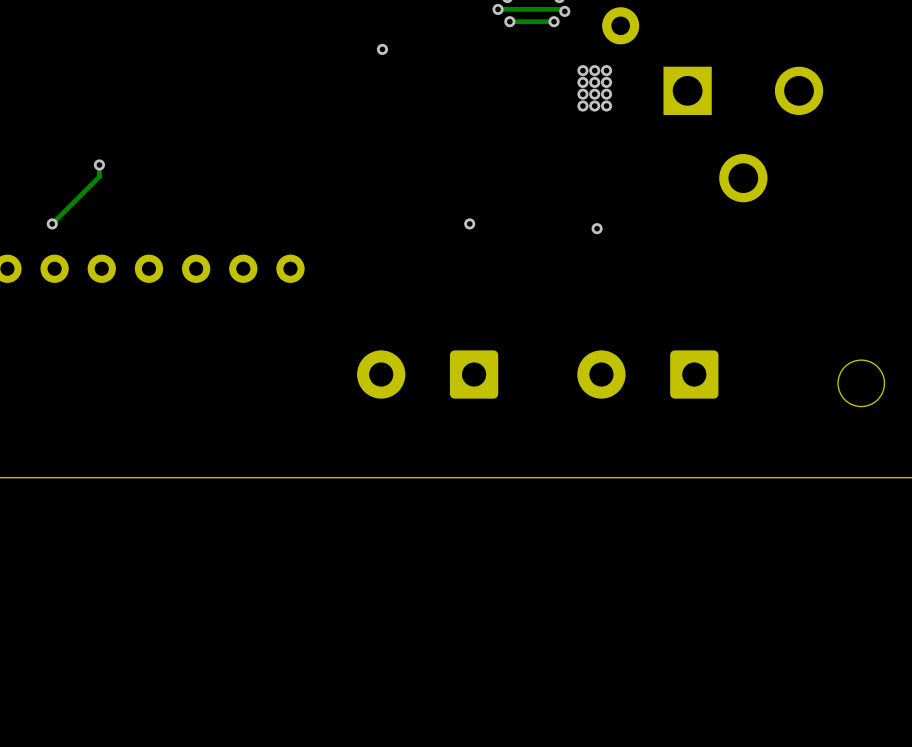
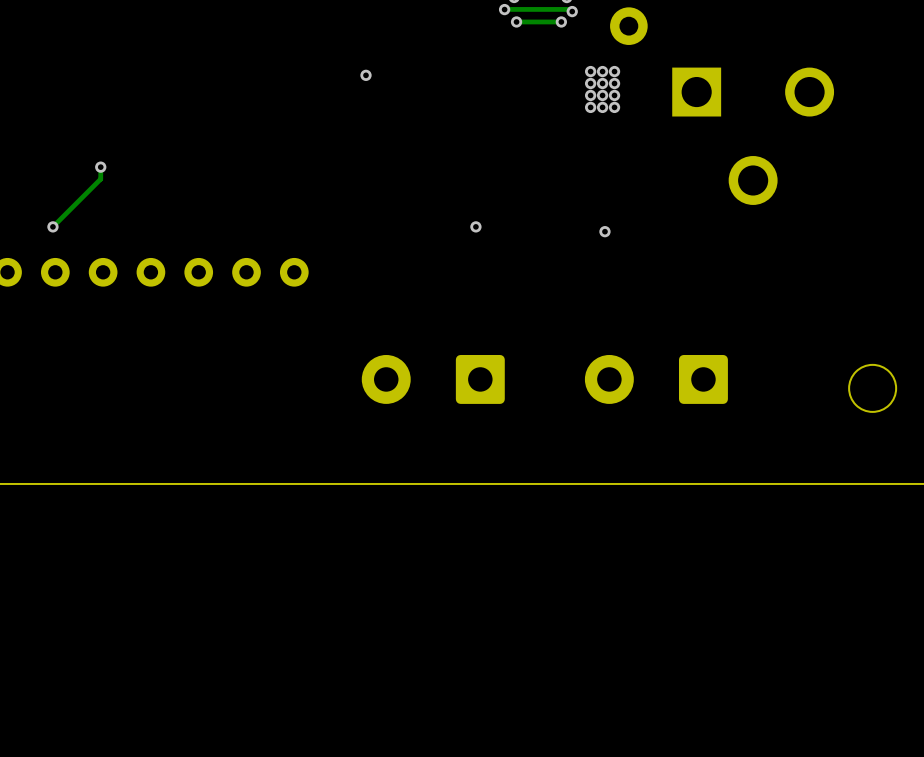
via position: (382, 49) -> (366, 75)

